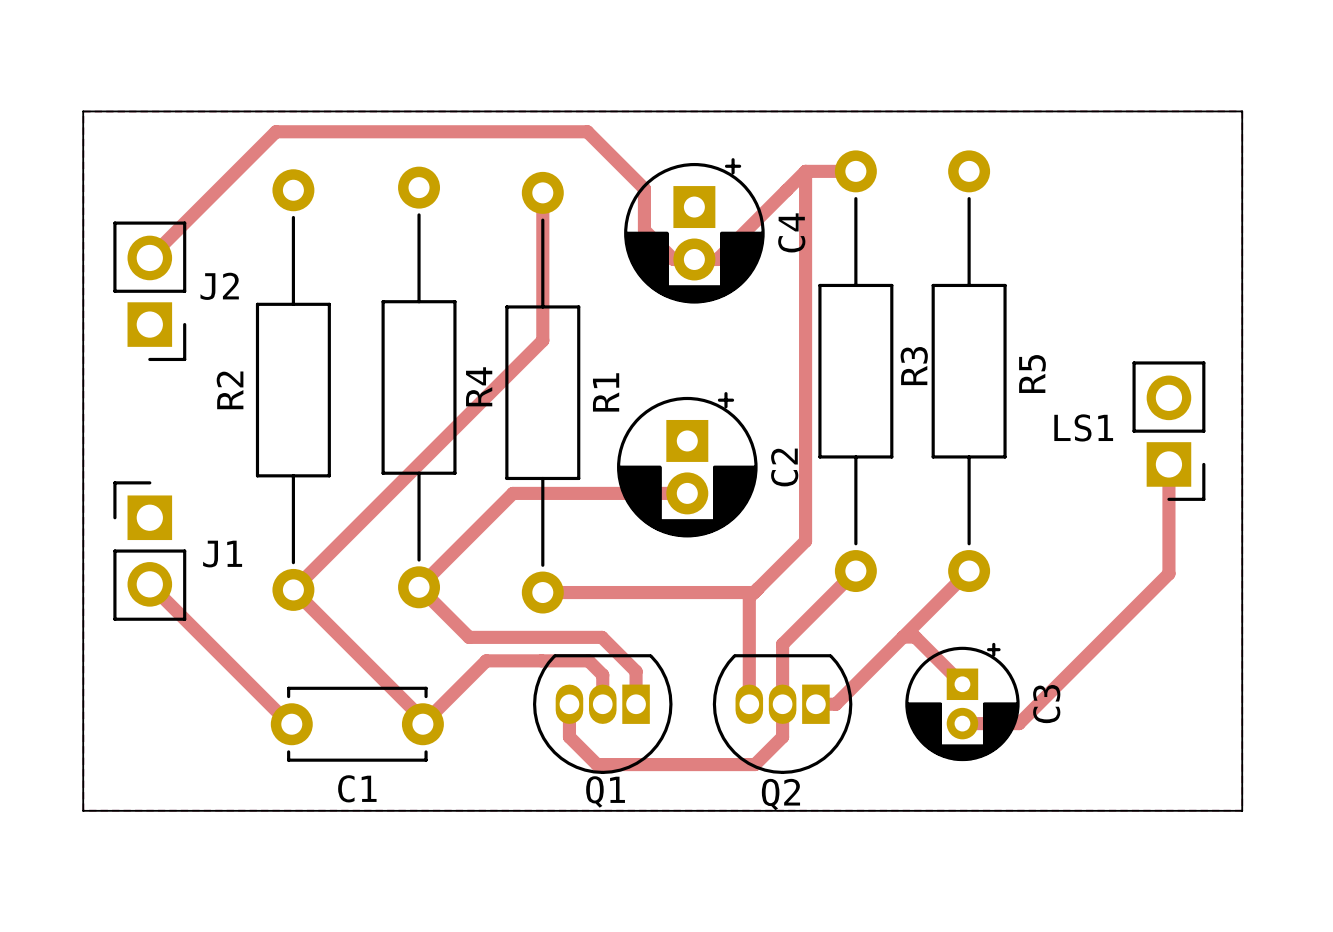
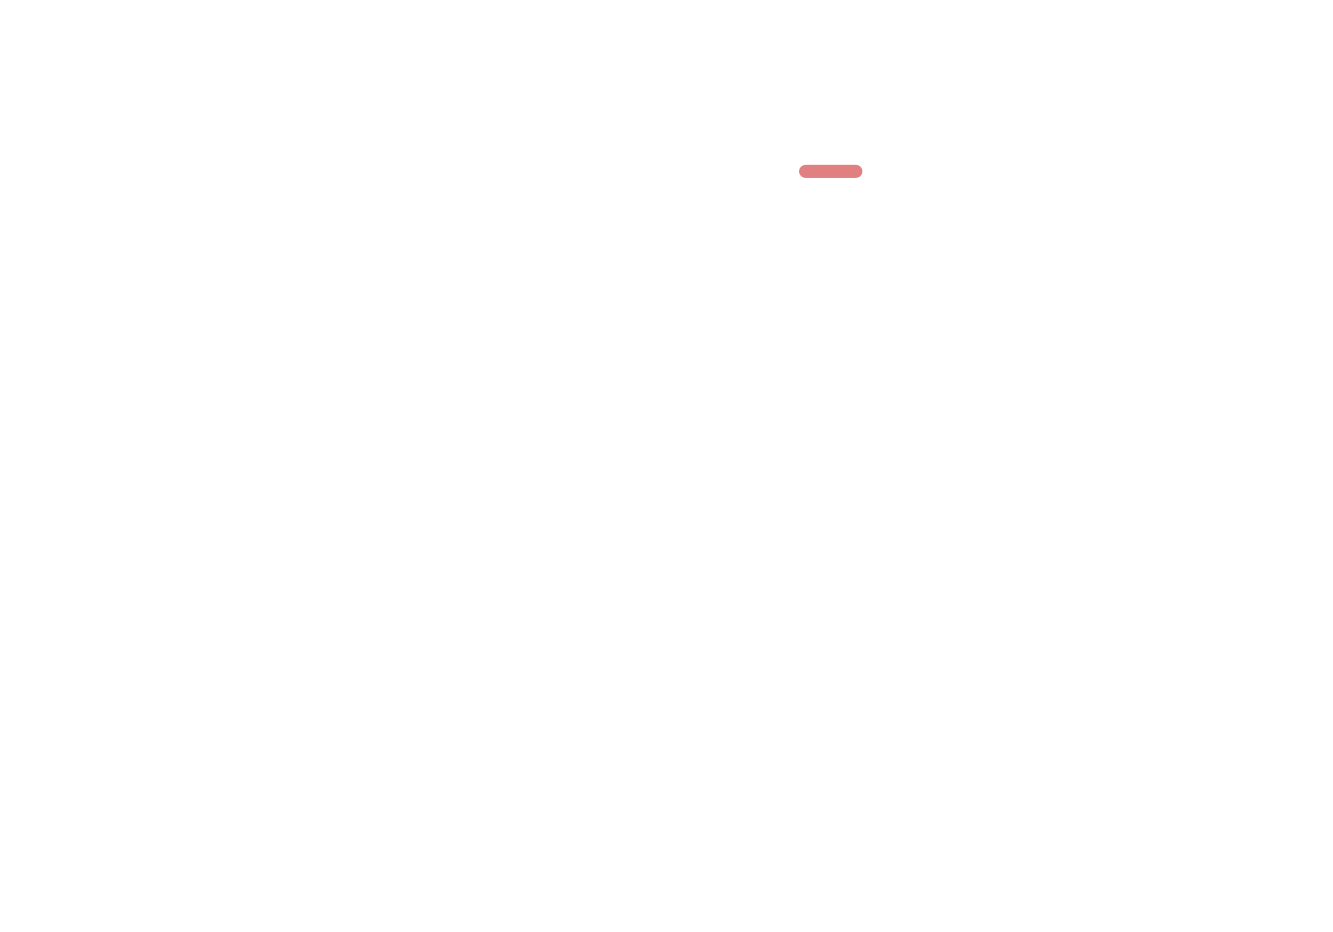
board edge: (83, 111) (1242, 111) (1242, 810) (83, 810) (83, 111) -> none
top track: (542, 192) (542, 340) (293, 589) (422, 719) (422, 724) (486, 660) (588, 660) (602, 675) (602, 704) -> none
C4: (694, 230) -> none
top track: (149, 257) (276, 131) (587, 131) (644, 188) (644, 230) (673, 259) (717, 259) (805, 171) (805, 541) (749, 597) (749, 704) -> none
J2: (149, 291) -> none
R3: (855, 371) -> none
R5: (969, 371) -> none
R4: (419, 387) -> none
R2: (293, 390) -> none
R1: (542, 392) -> none
LS1: (1168, 431) -> none
C2: (687, 464) -> none
top track: (1168, 464) (1168, 573) (1019, 723) (962, 723) -> none
top track: (687, 493) (512, 493) (419, 587) (469, 637) (601, 637) (636, 671) (636, 704) -> none
J1: (149, 551) -> none
top track: (855, 571) (782, 644) (782, 737) (755, 764) (596, 764) (569, 737) (569, 704) -> none
top track: (969, 571) (835, 704) (815, 704) -> none
top track: (149, 584) (291, 724) -> none
top track: (542, 592) (754, 592) -> none
top track: (903, 637) (915, 637) (962, 684) -> none
C3: (962, 701) -> none
Q1: (602, 714) -> none
Q2: (782, 714) -> none
C1: (357, 724) -> none

